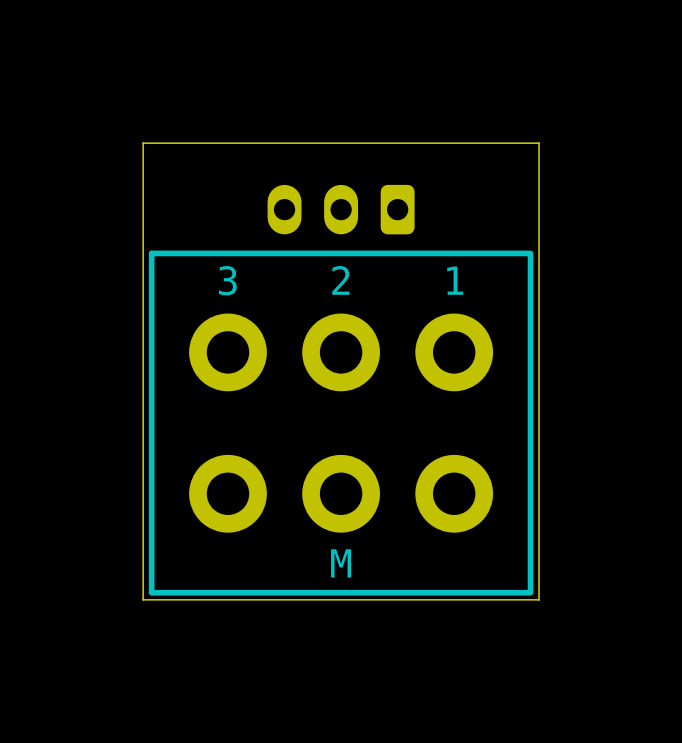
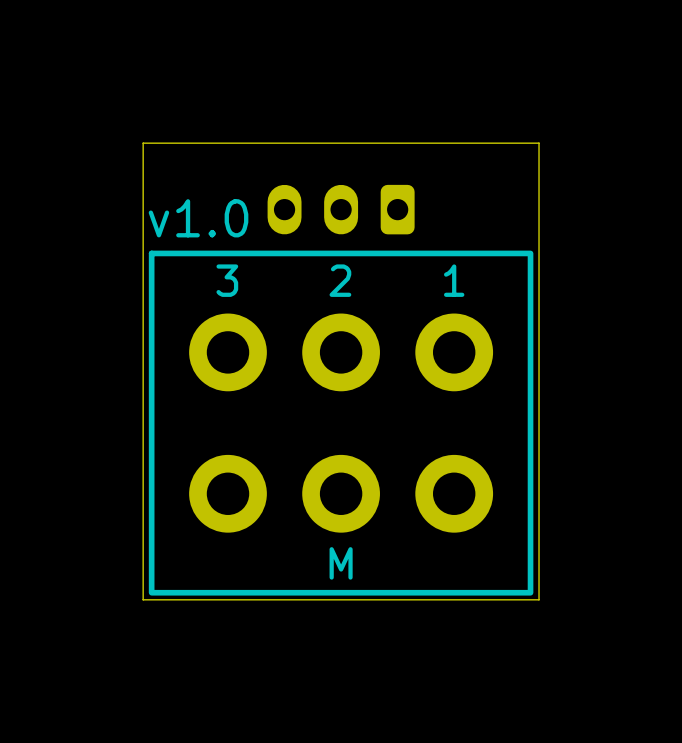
text: none -> v1.0 (198, 218)

